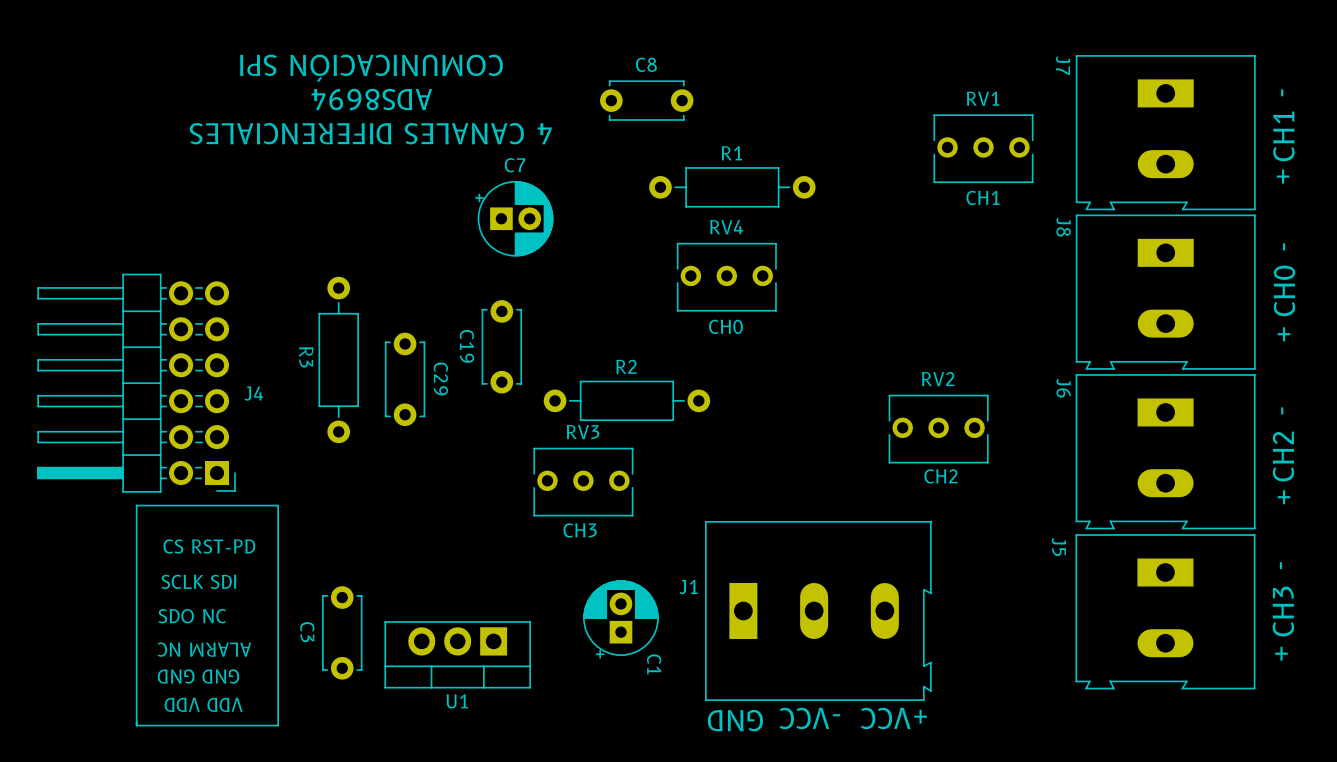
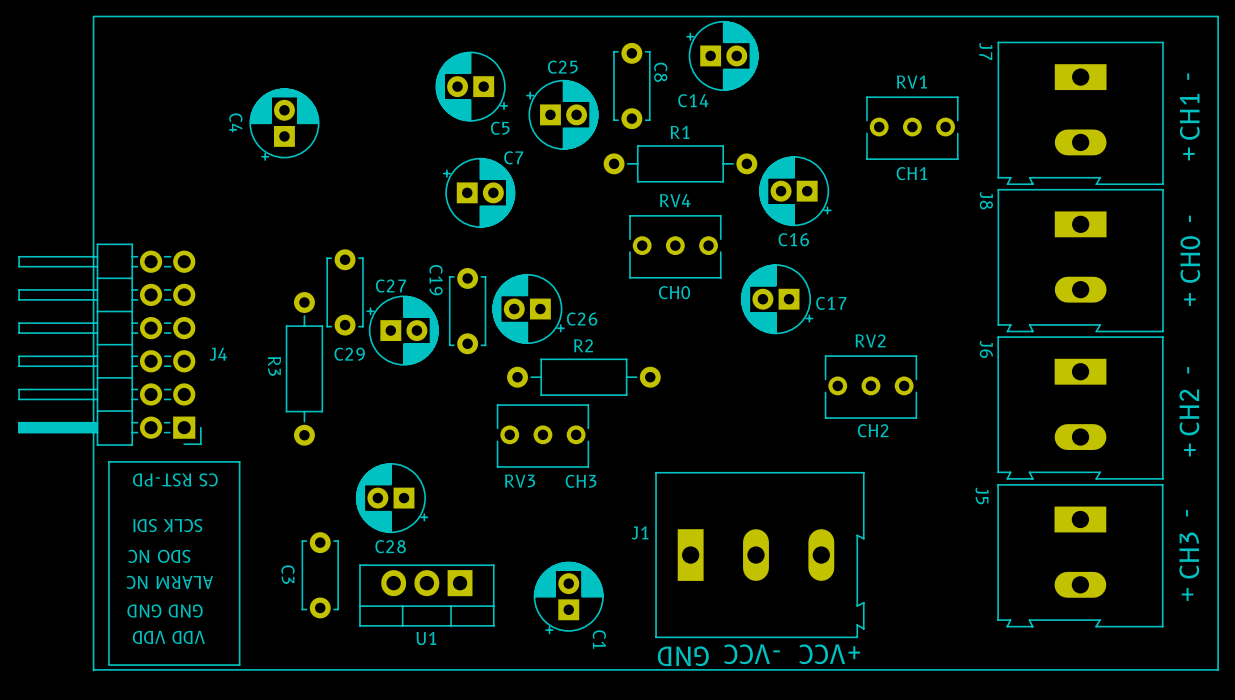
line: none -> (1218, 16) (93, 16)
line: none -> (1218, 16) (1218, 669) (93, 669)
line: none -> (93, 17) (93, 670)
text: COMUNICACIÓN SPI (371, 68) -> none
C14: none -> (722, 55)
text: ADS8694 (371, 99) -> none
C8 rotation: 0° (646, 100) -> 90° clockwise (631, 85)
C5: none -> (471, 86)
text: 4 CANALES DIFERENCIALES (370, 133) -> none
C25: none -> (562, 114)
C4: none -> (284, 124)
C7 name position: C7 (515, 165) -> C7 (513, 157)
C16: none -> (795, 191)
C17: none -> (777, 299)
C26: none -> (528, 309)
C19 name position: C19 (466, 346) -> C19 (436, 280)
R3 position: (338, 359) -> (304, 368)
C27: none -> (402, 330)
C29 name rotation: 0° (440, 378) -> 90° counterclockwise (349, 354)
C29 name position: C29 (440, 378) -> C29 (349, 354)
C29 position: (405, 379) -> (345, 292)
J4 position: (136, 383) -> (109, 344)
R2 position: (626, 400) -> (583, 377)
RV3 name position: RV3 (583, 432) -> RV3 (520, 481)
line: (278, 505) (278, 725) (136, 725) (136, 505) (278, 505) -> none
text position: CH3 (580, 530) -> CH3 (581, 481)
text rotation: 0° (209, 546) -> 180° (175, 479)
C28: none -> (392, 498)
text rotation: 0° (198, 581) -> 180° (168, 525)
text rotation: 0° (192, 616) -> 180° (159, 556)
C1 position: (620, 619) -> (568, 597)
text position: ALARM NC (204, 649) -> ALARM NC (169, 582)
text position: GND GND (198, 676) -> GND GND (165, 610)
text position: VDD VDD (203, 704) -> VDD VDD (168, 637)
line: none -> (108, 664) (108, 461) (239, 461) (239, 665) (108, 665)

